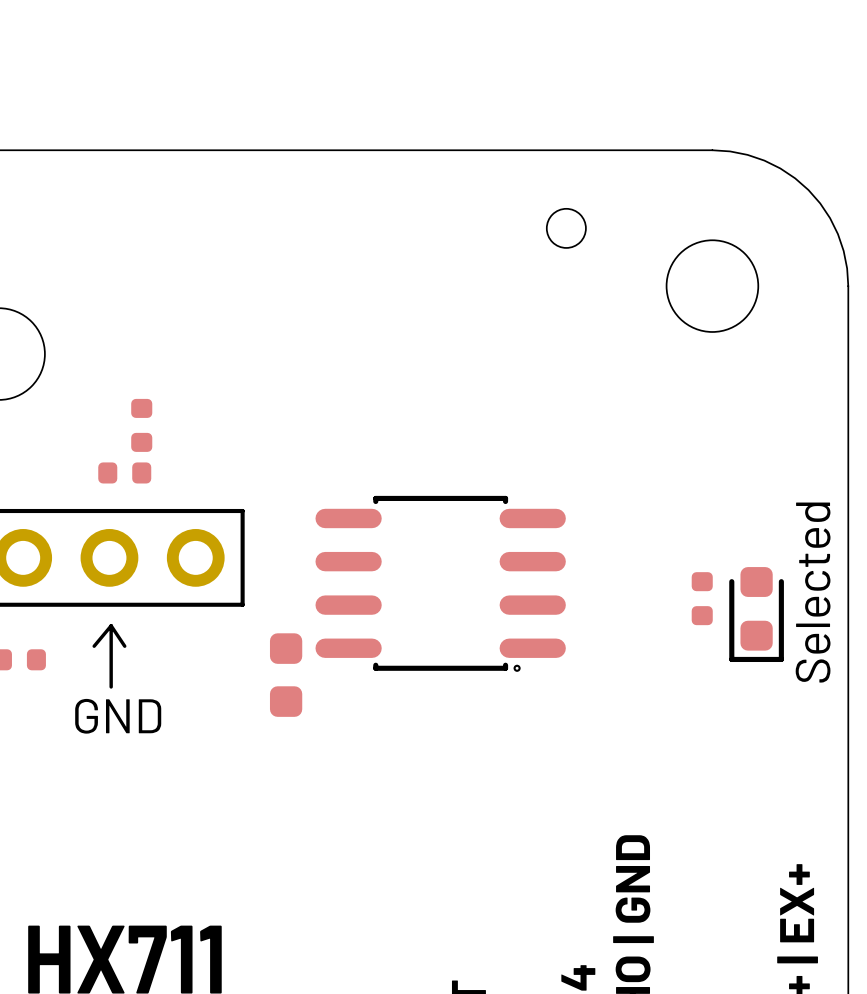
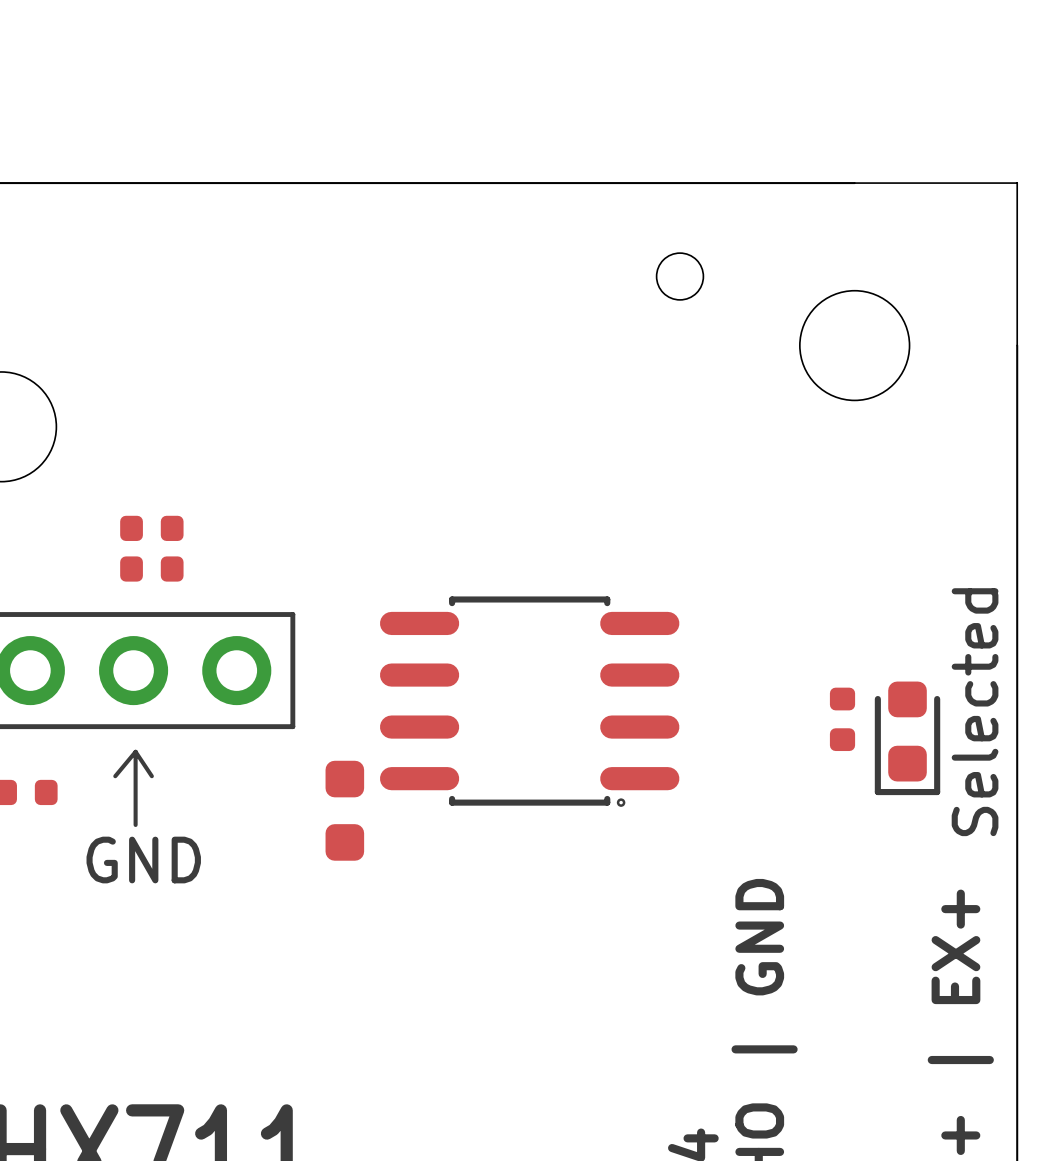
board edge: (712, 150) (730, 151) (764, 160) (795, 178) (808, 190) (820, 203) (837, 234) (847, 268) (848, 286) -> (854, 183) (1017, 183) (1017, 345)
part rotation: 0° (141, 425) -> 90° clockwise (151, 528)

